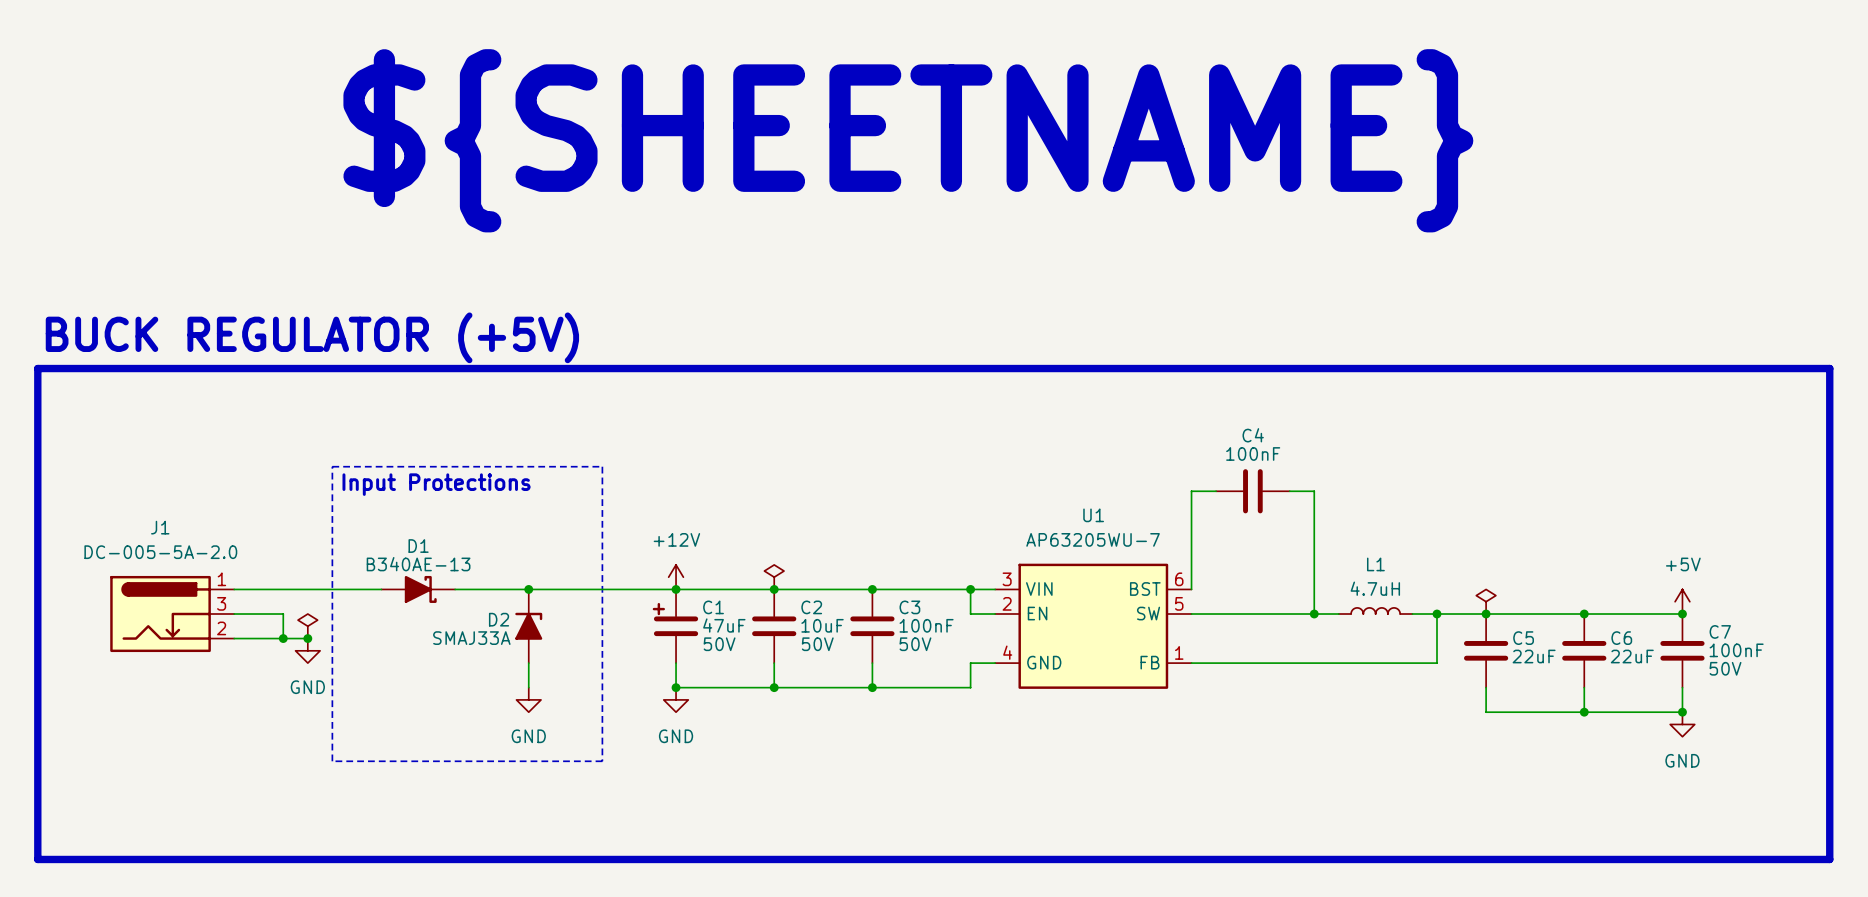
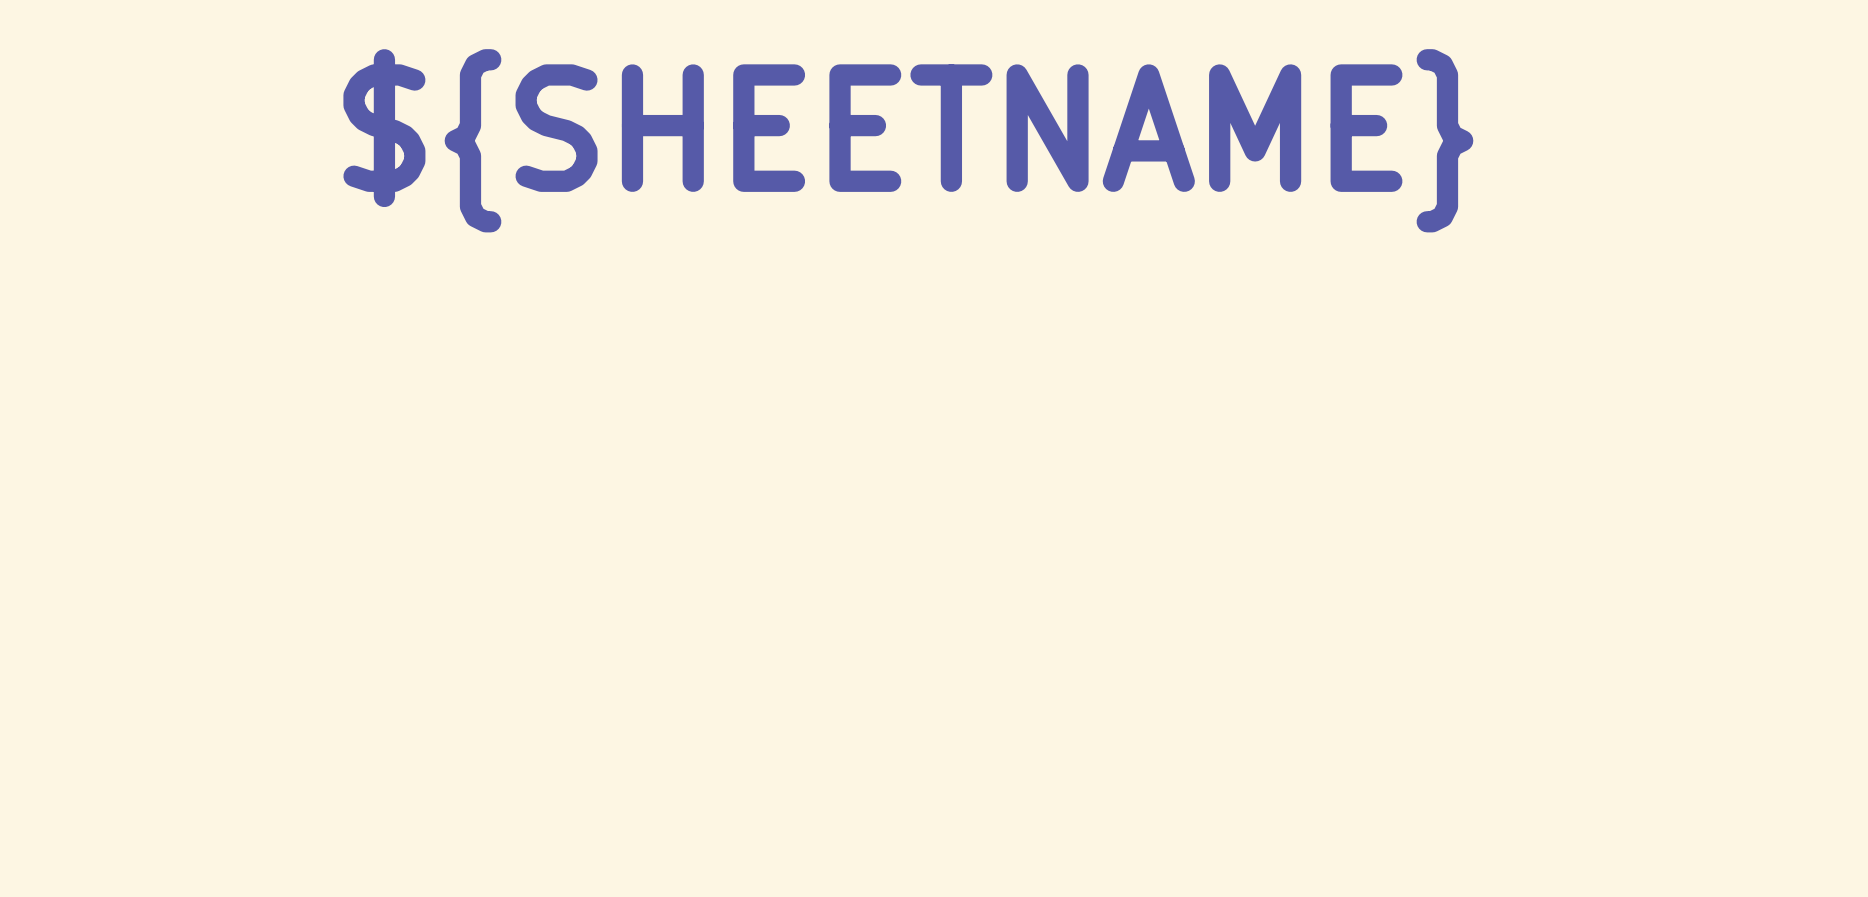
text: BUCK REGULATOR (+5V) (312, 337) -> none
line: (37, 368) (1829, 368) (1829, 859) (37, 859) (37, 368) -> none
line: (332, 466) (602, 466) (602, 761) (332, 761) (332, 466) -> none
text: Input Protections (436, 484) -> none
wire: (1216, 491) (1191, 491) (1191, 589) -> none
C4: 100nF (1252, 491) -> none
wire: (1289, 491) (1314, 491) (1314, 614) -> none
power symbol: +12V (676, 577) -> none
power symbol: (774, 577) -> none
wire: (234, 589) (381, 589) -> none
D1: B340AE-13 (418, 589) -> none
wire: (455, 589) (995, 589) -> none
junction: (528, 589) -> none
junction: (676, 589) -> none
junction: (774, 589) -> none
junction: (872, 589) -> none
wire: (970, 589) (970, 614) (995, 614) -> none
junction: (970, 589) -> none
power symbol: (1486, 601) -> none
power symbol: +5V (1682, 601) -> none
L1: 4.7uH (1375, 610) -> none
J1: DC-005-5A-2.0 (172, 614) -> none
wire: (234, 614) (283, 614) (283, 638) -> none
wire: (1191, 614) (1338, 614) -> none
junction: (1314, 614) -> none
wire: (1412, 614) (1682, 614) -> none
wire: (1436, 614) (1436, 663) (1191, 663) -> none
junction: (1436, 614) -> none
junction: (1486, 614) -> none
junction: (1584, 614) -> none
junction: (1682, 614) -> none
power symbol: (307, 626) -> none
D2: SMAJ33A (528, 626) -> none
C1: 47uF (675, 626) -> none
C2: 10uF (774, 626) -> none
C3: 100nF (872, 626) -> none
U1: AP63205WU-7 (1093, 626) -> none
wire: (234, 638) (307, 638) -> none
junction: (283, 638) -> none
junction: (307, 638) -> none
power symbol: GND (307, 650) -> none
C5: 22uF (1486, 650) -> none
C6: 22uF (1584, 650) -> none
C7: 100nF (1682, 650) -> none
wire: (528, 663) (528, 687) -> none
wire: (676, 663) (676, 687) (970, 687) (970, 663) (995, 663) -> none
wire: (774, 663) (774, 687) -> none
wire: (872, 663) (872, 687) -> none
junction: (676, 687) -> none
junction: (774, 687) -> none
junction: (872, 687) -> none
wire: (1486, 687) (1486, 712) (1682, 712) (1682, 687) -> none
wire: (1584, 687) (1584, 712) -> none
power symbol: GND (528, 699) -> none
power symbol: GND (676, 699) -> none
junction: (1584, 712) -> none
junction: (1682, 712) -> none
power symbol: GND (1682, 724) -> none

